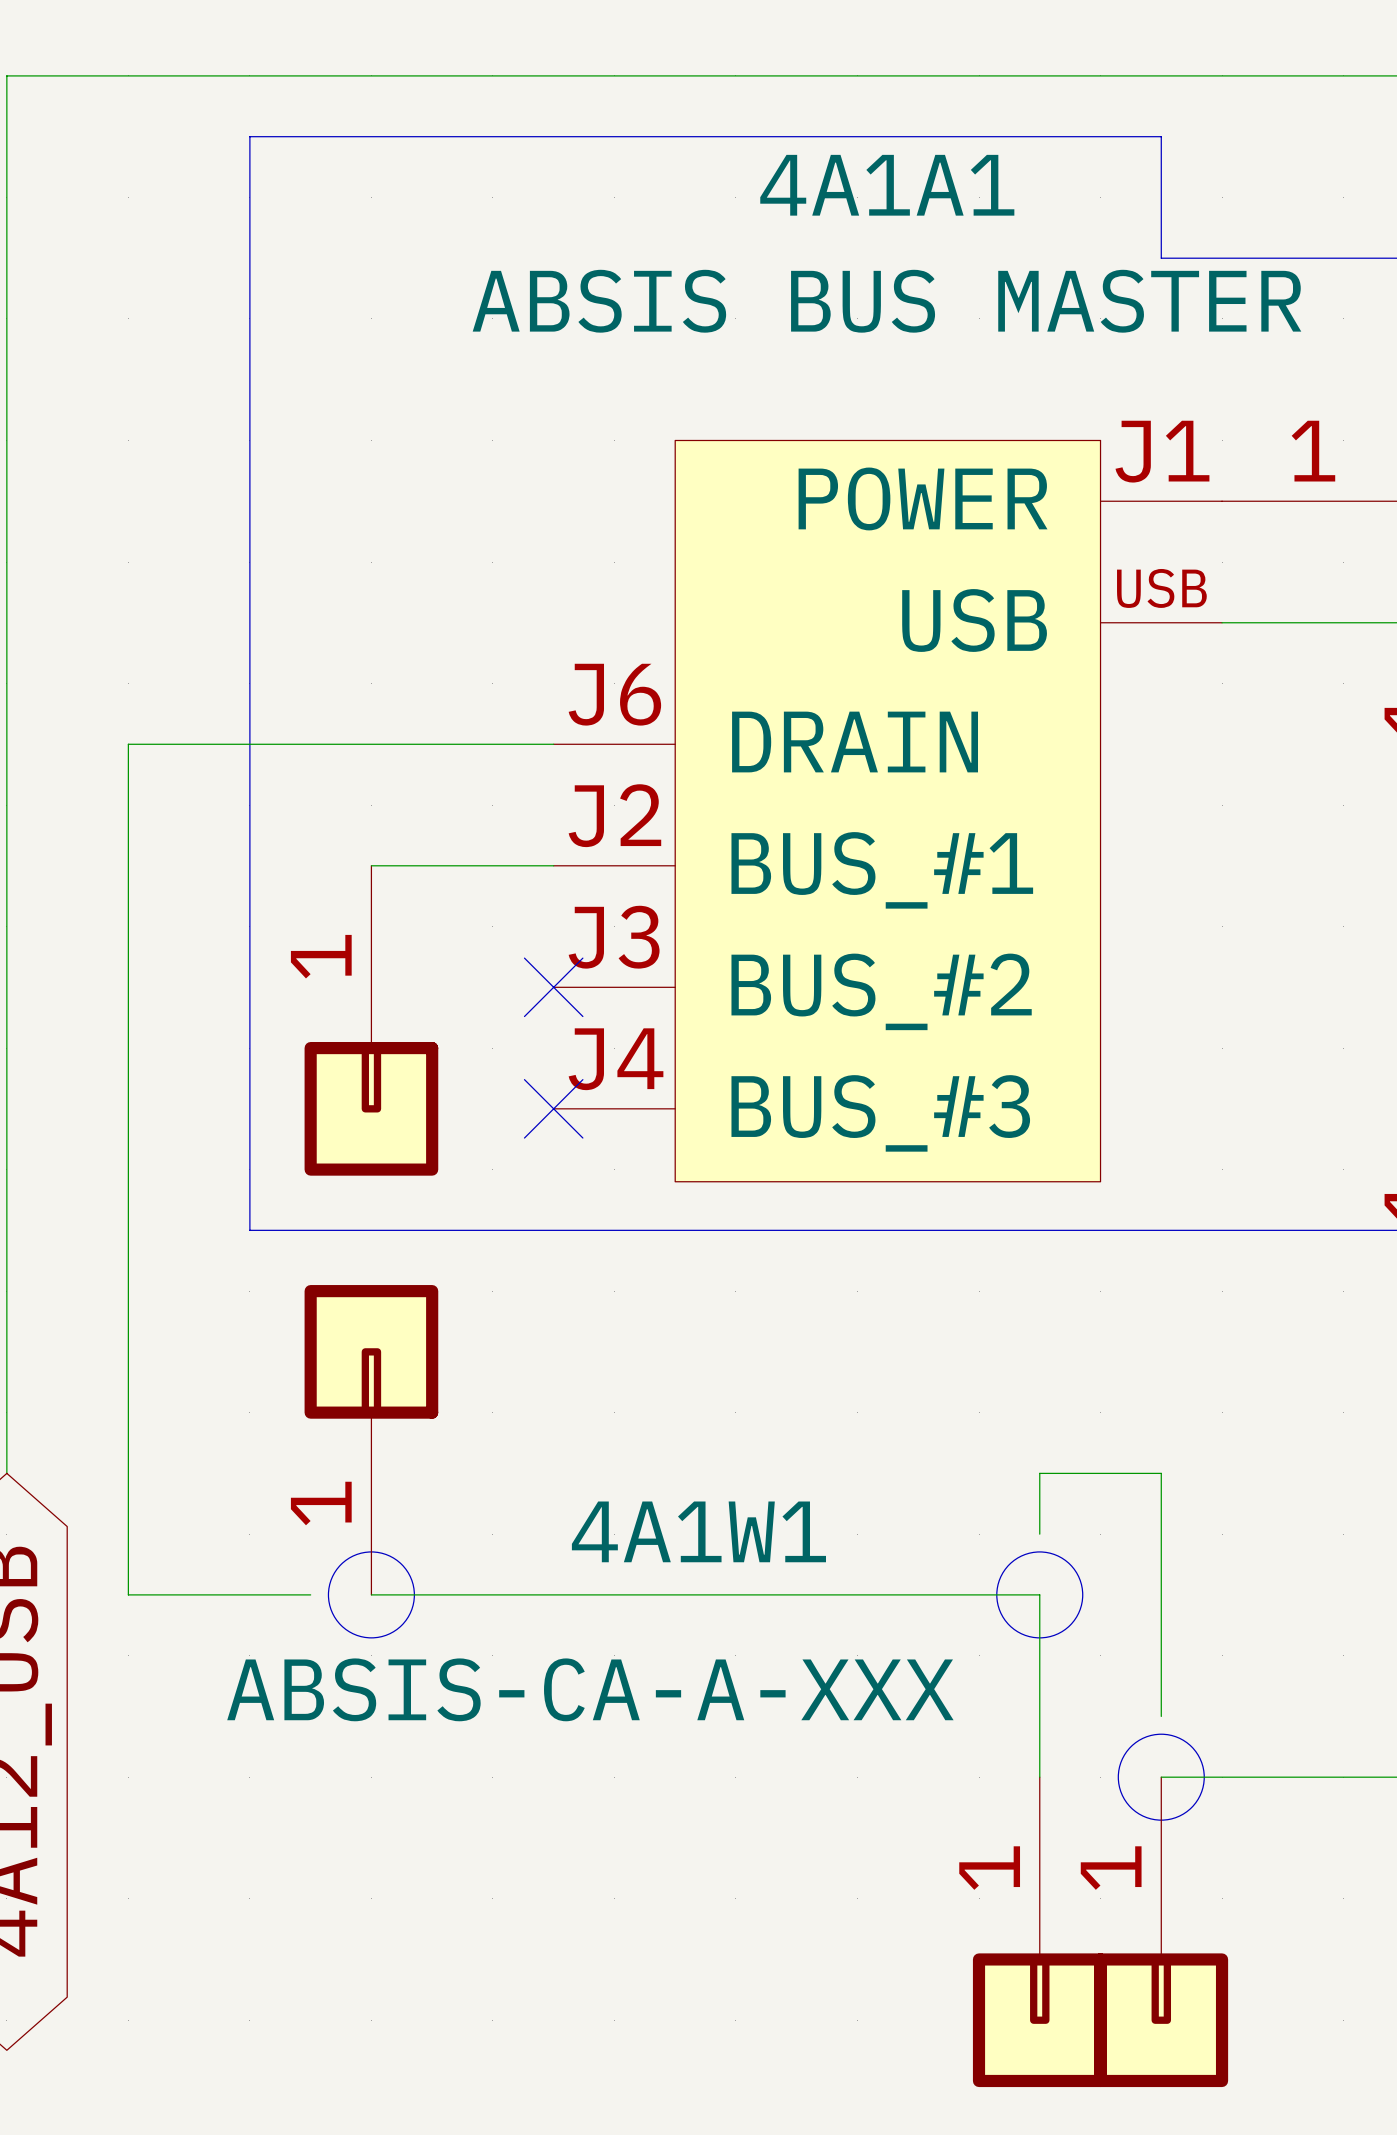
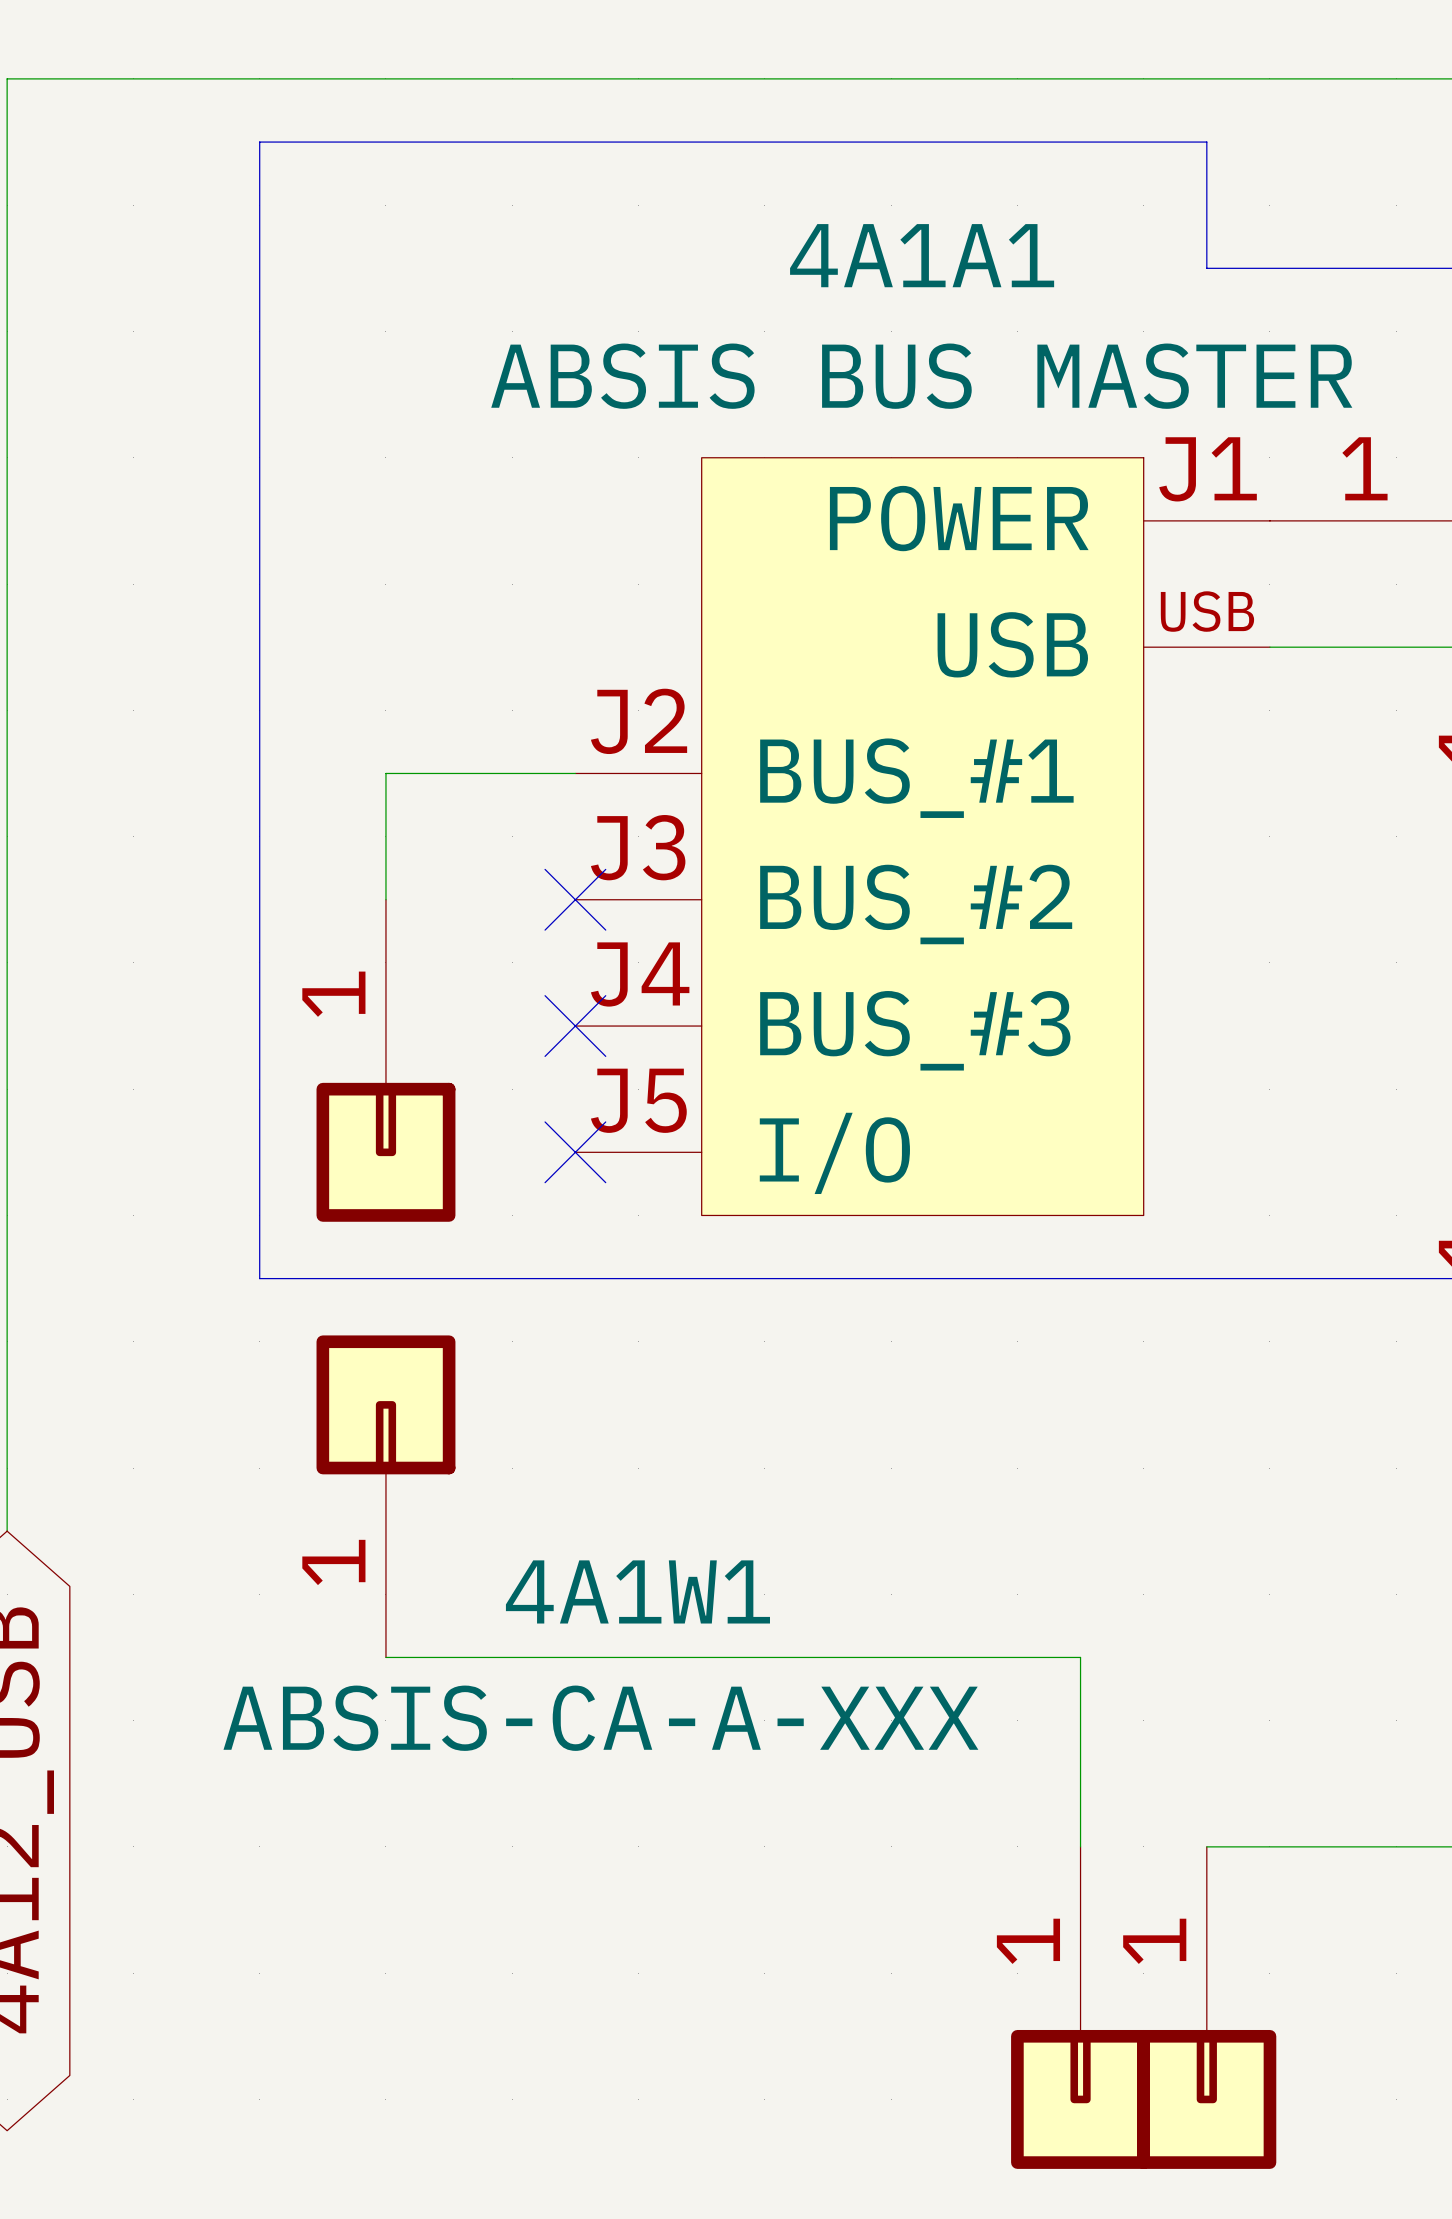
4A1A1 symbol: [553, 440, 1223, 1182] -> [575, 457, 1270, 1216]
wire: (371, 744) (128, 744) (128, 1594) (310, 1594) -> none
wire: (371, 865) (553, 865) -> (385, 899) (385, 773)
no-connect mark: none -> (575, 899)
4A1W1 name position: 4A1W1 (698, 1531) -> 4A1W1 (637, 1591)
wire: (1039, 1534) (1039, 1473) (1161, 1473) (1161, 1716) -> none
drawing: [328, 1551, 415, 1638] -> none
drawing: [996, 1551, 1083, 1638] -> none
4A1W1 value position: ABSIS-CA-A-XXX (590, 1689) -> ABSIS-CA-A-XXX (600, 1718)
drawing: [1118, 1734, 1205, 1821] -> none

